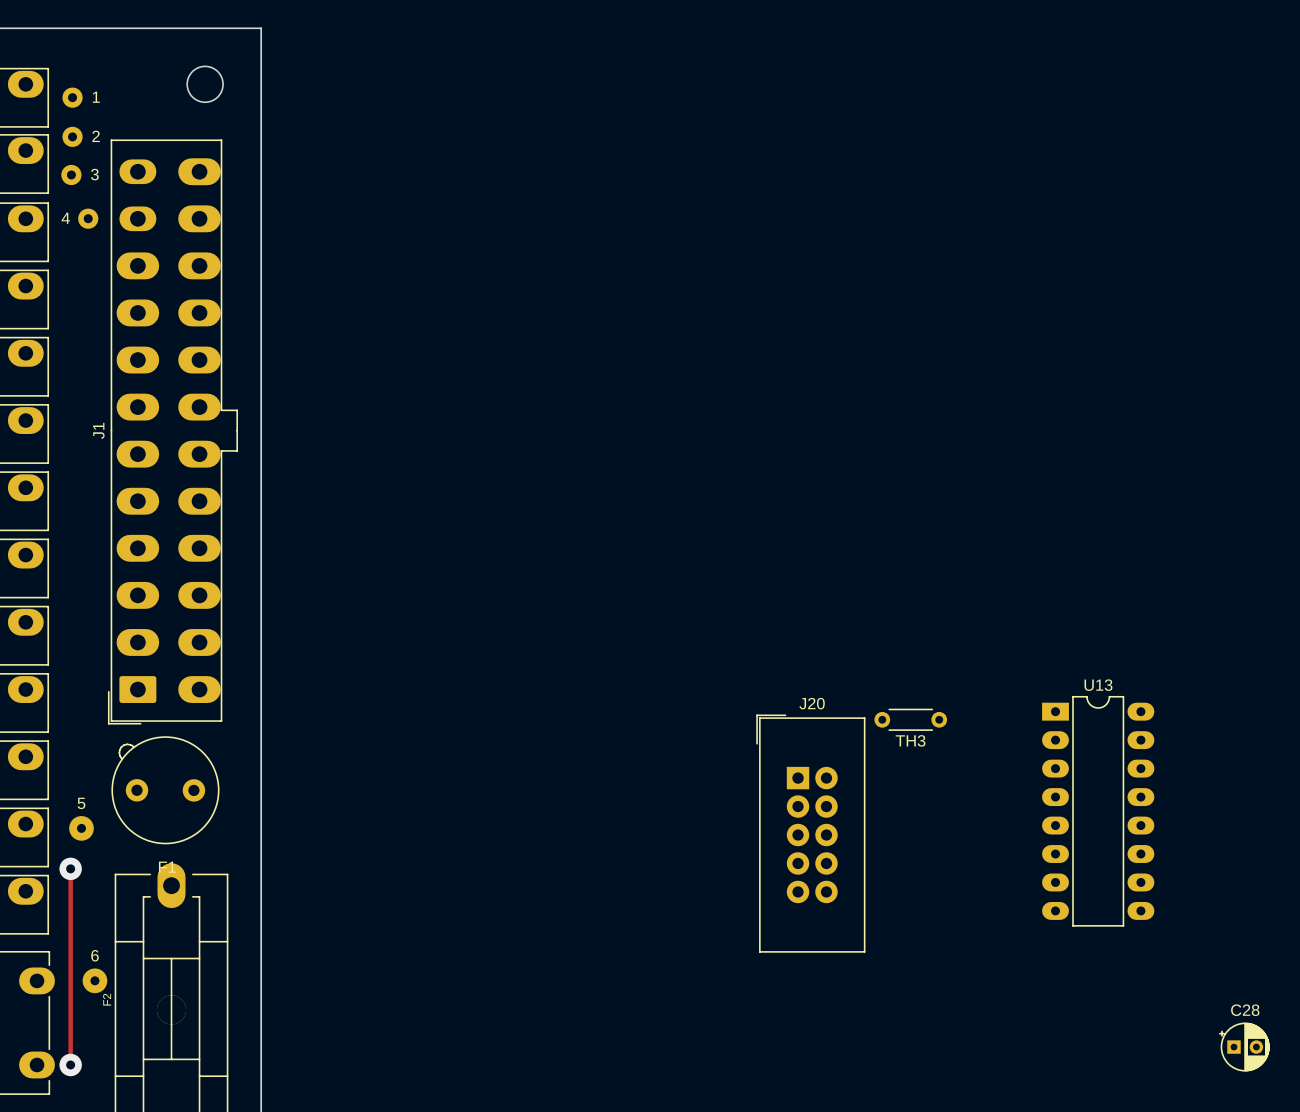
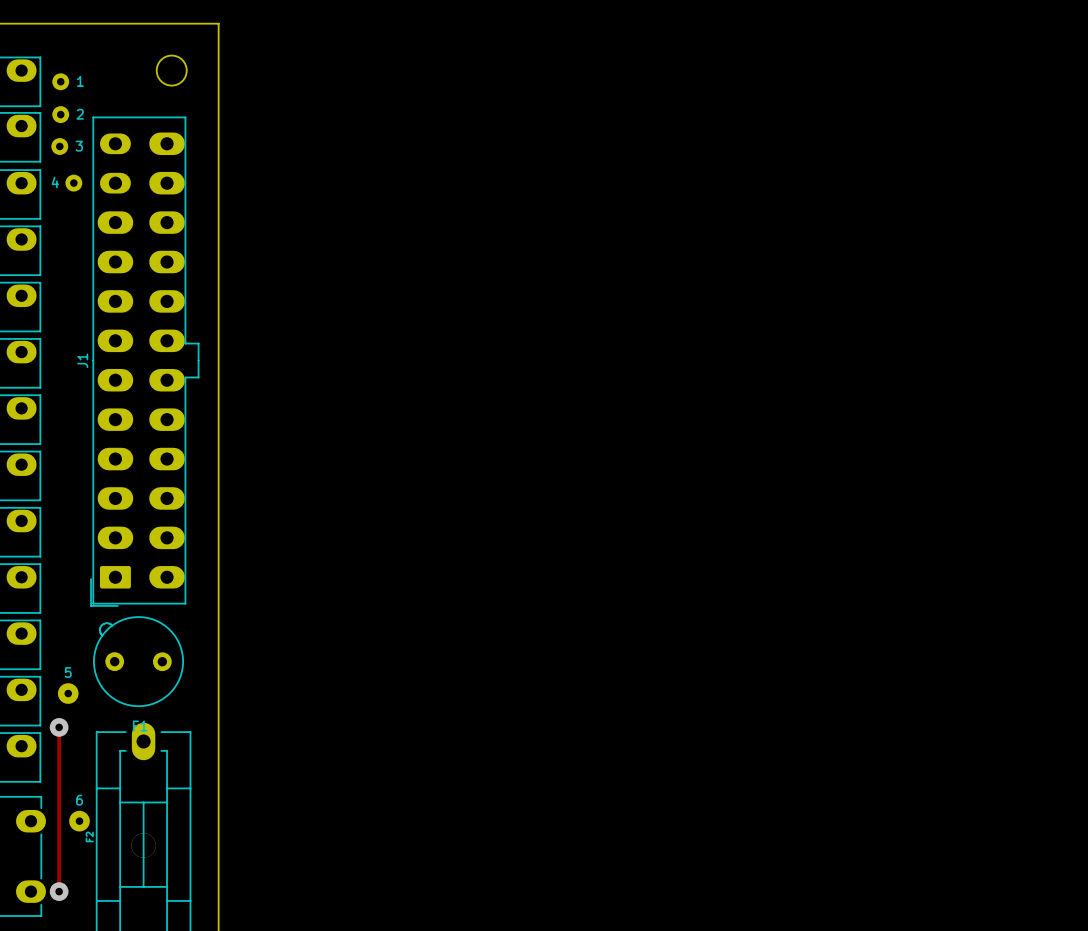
TH3: (910, 719) -> none
U13: (1098, 811) -> none
J20: (810, 833) -> none
C28: (1244, 1047) -> none

